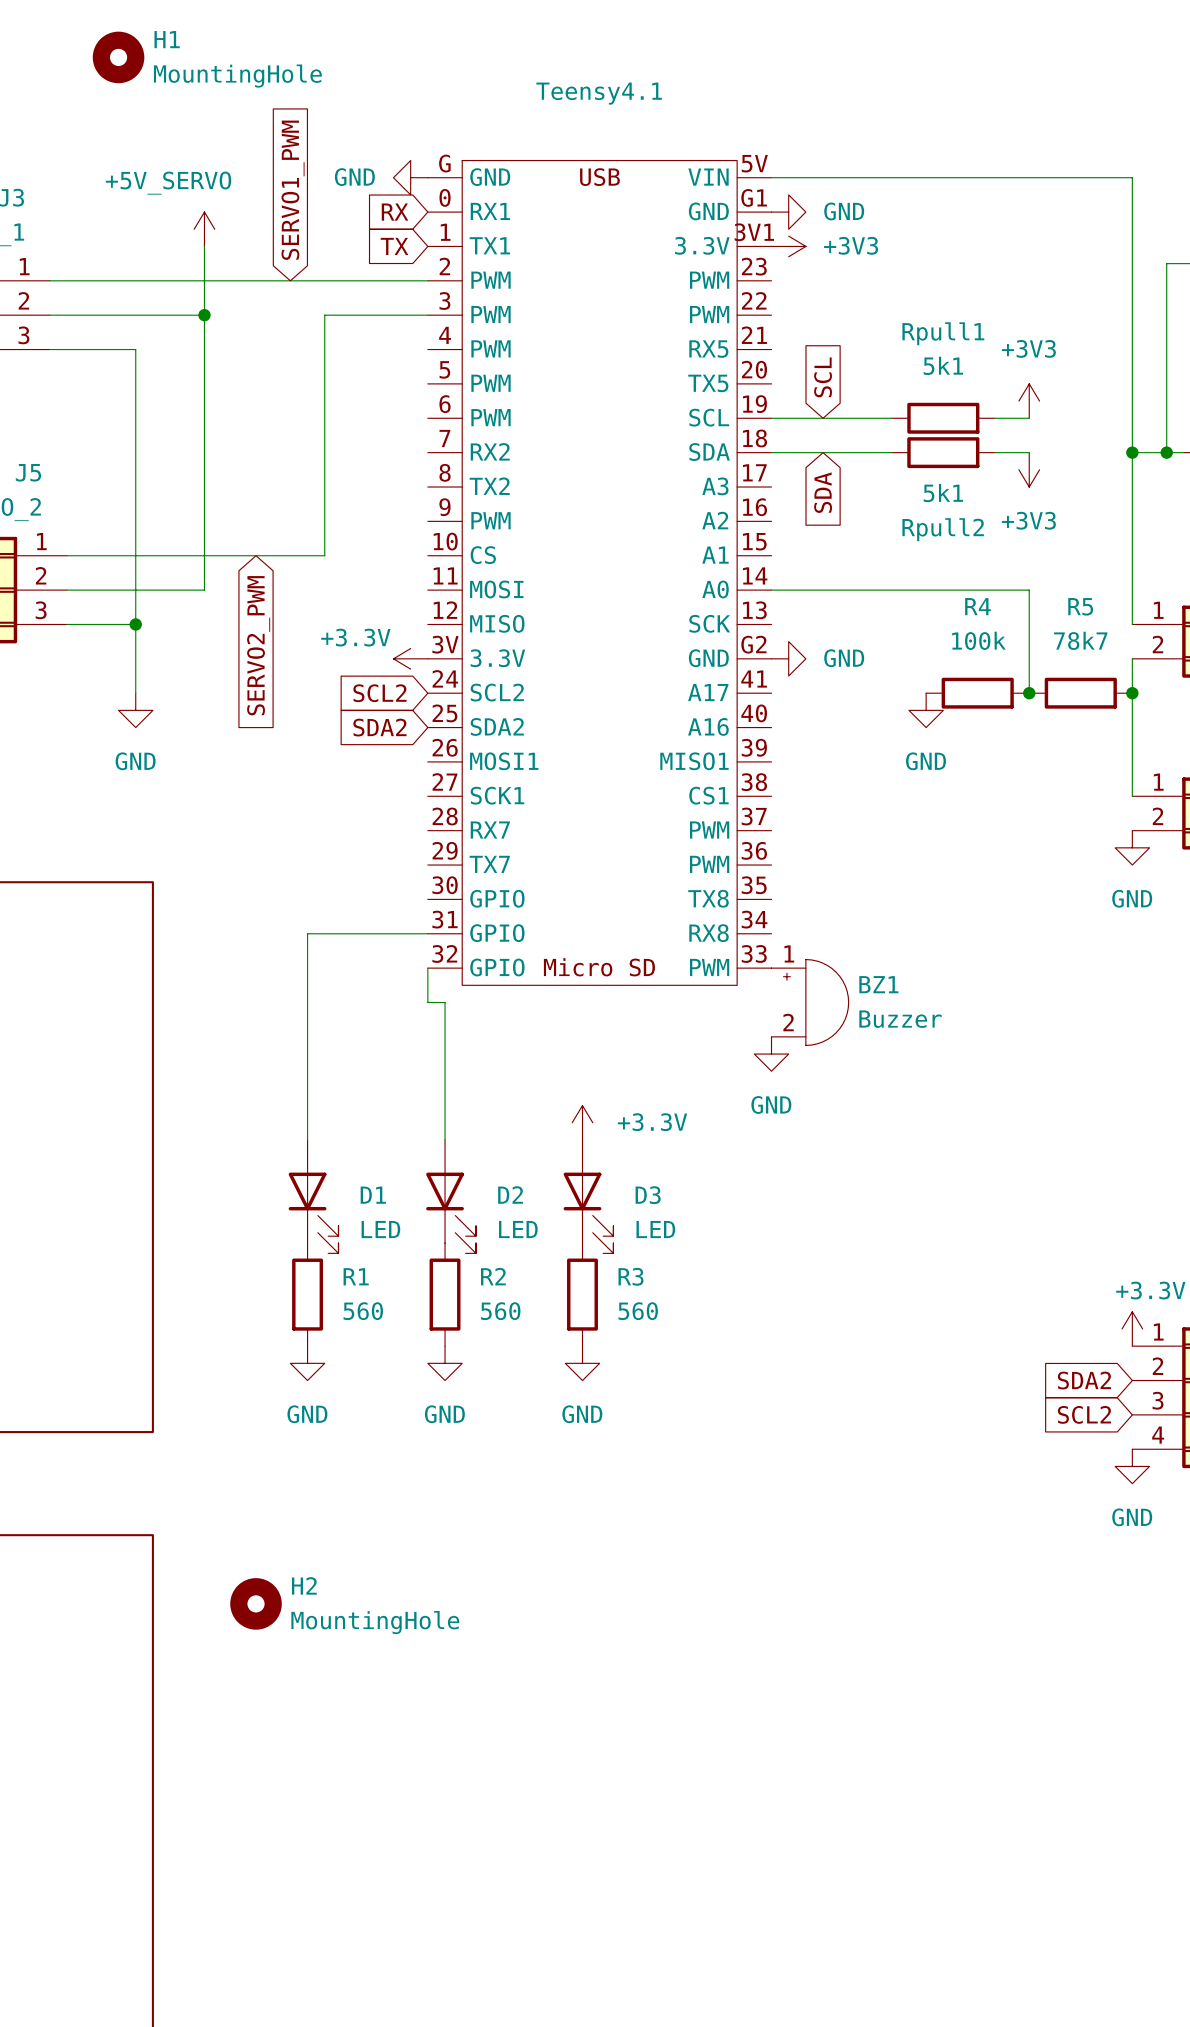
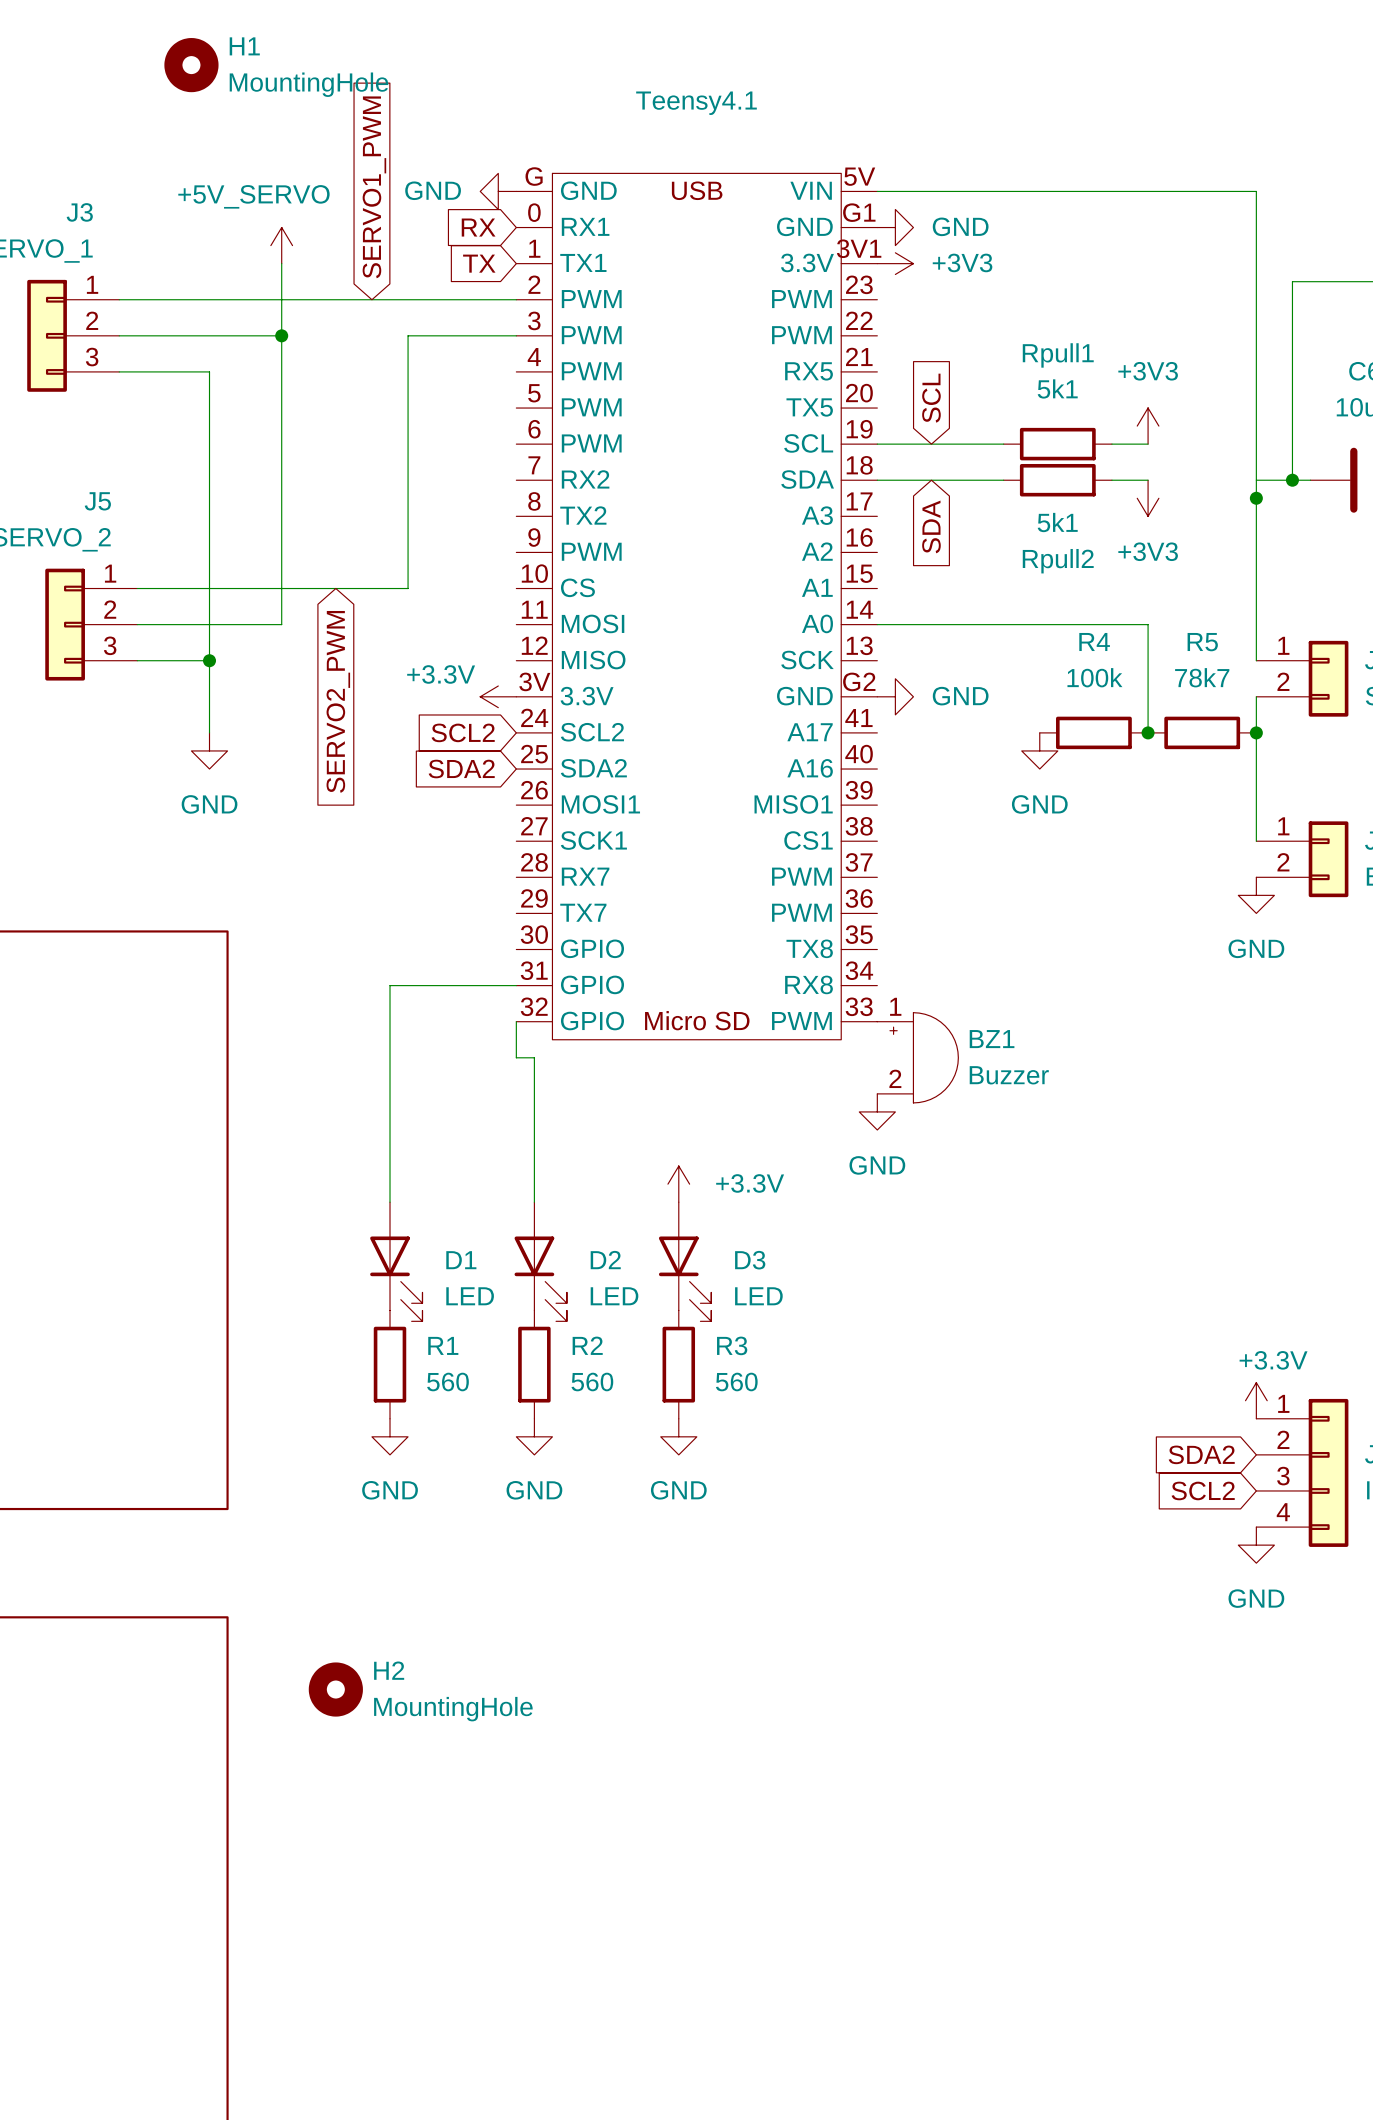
junction position: (1132, 452) -> (1256, 498)

